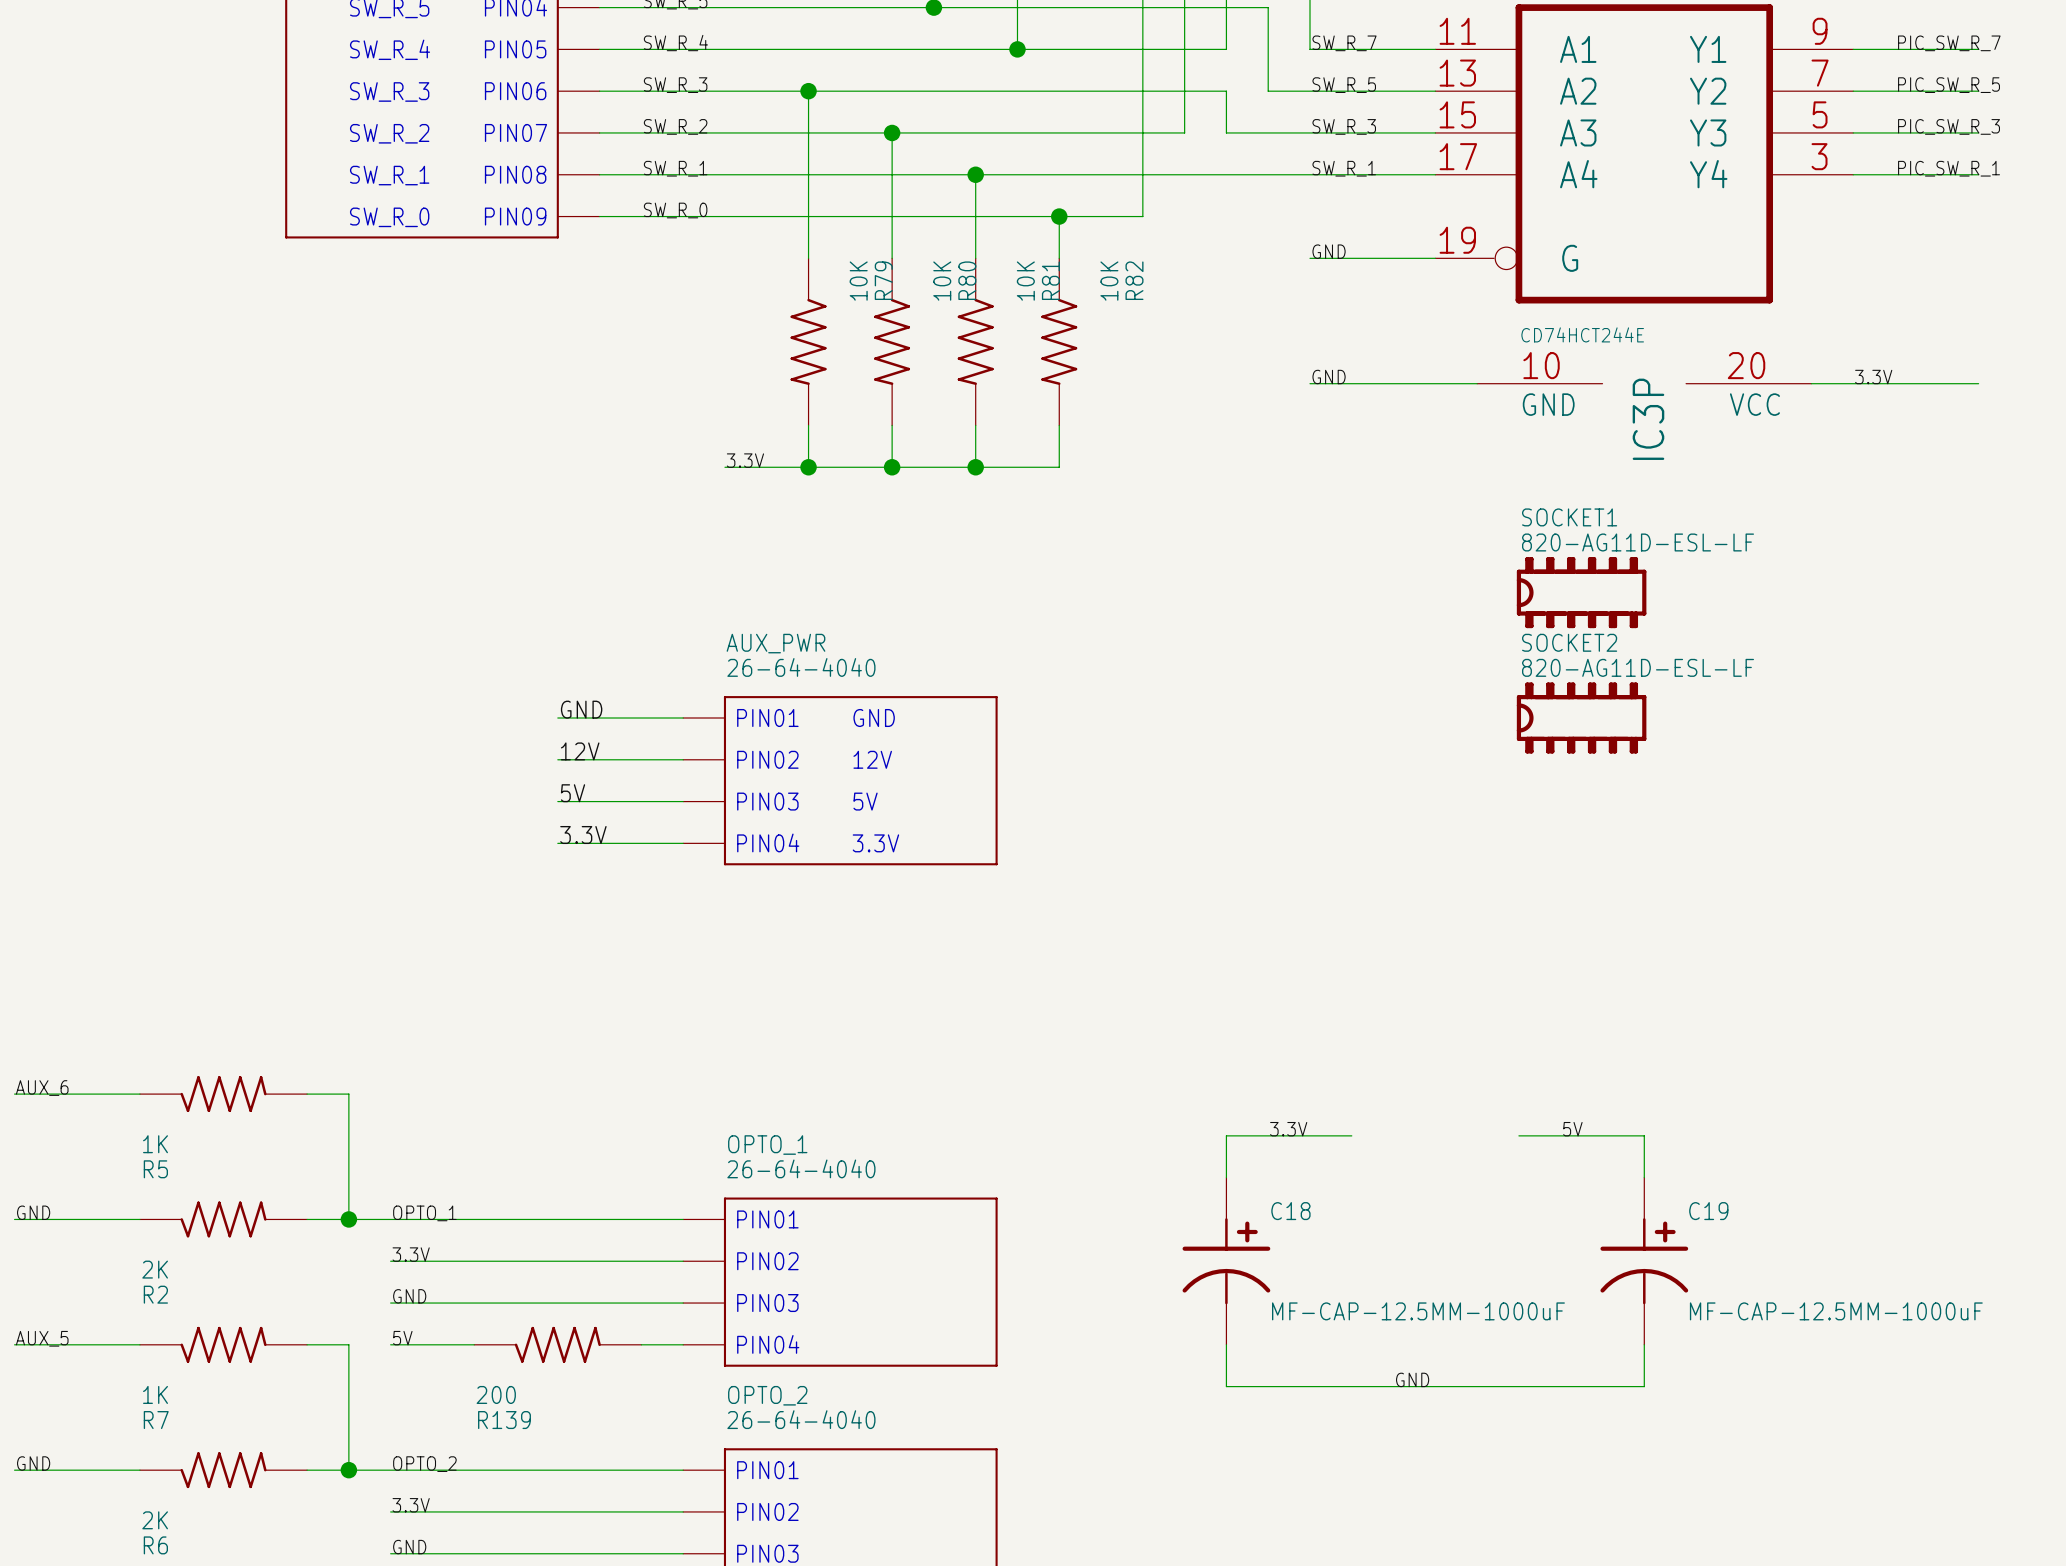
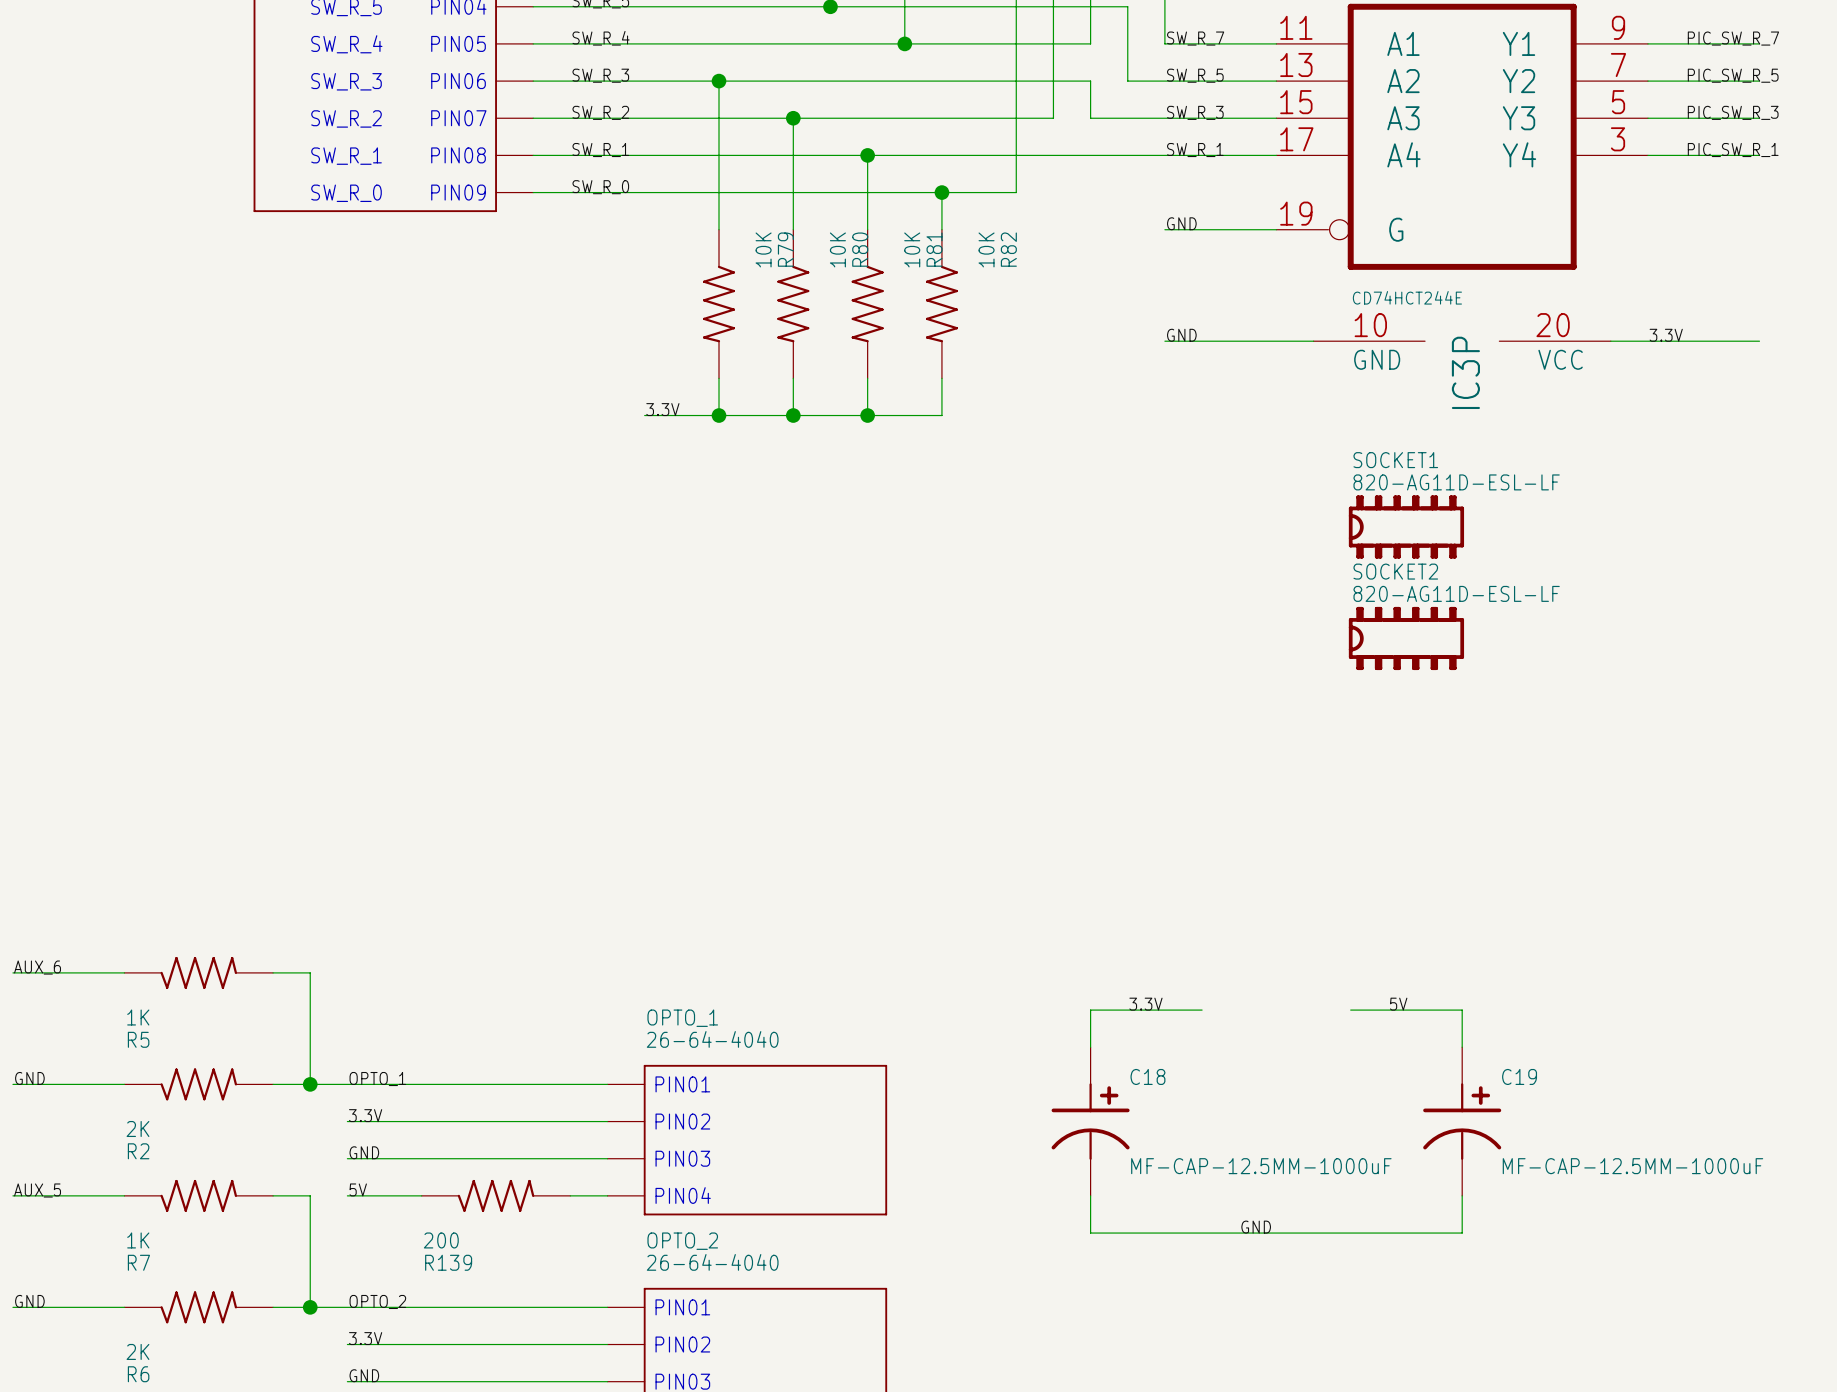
label: GND (581, 709) -> none
wire: (557, 718) (683, 718) -> none
label: 12V (580, 751) -> none
wire: (557, 759) (683, 759) -> none
AUX_PWR: 26-64-4040 (840, 780) -> none
label: 5V (573, 793) -> none
wire: (557, 801) (683, 801) -> none
label: 3.3V (583, 835) -> none
wire: (557, 843) (683, 843) -> none

